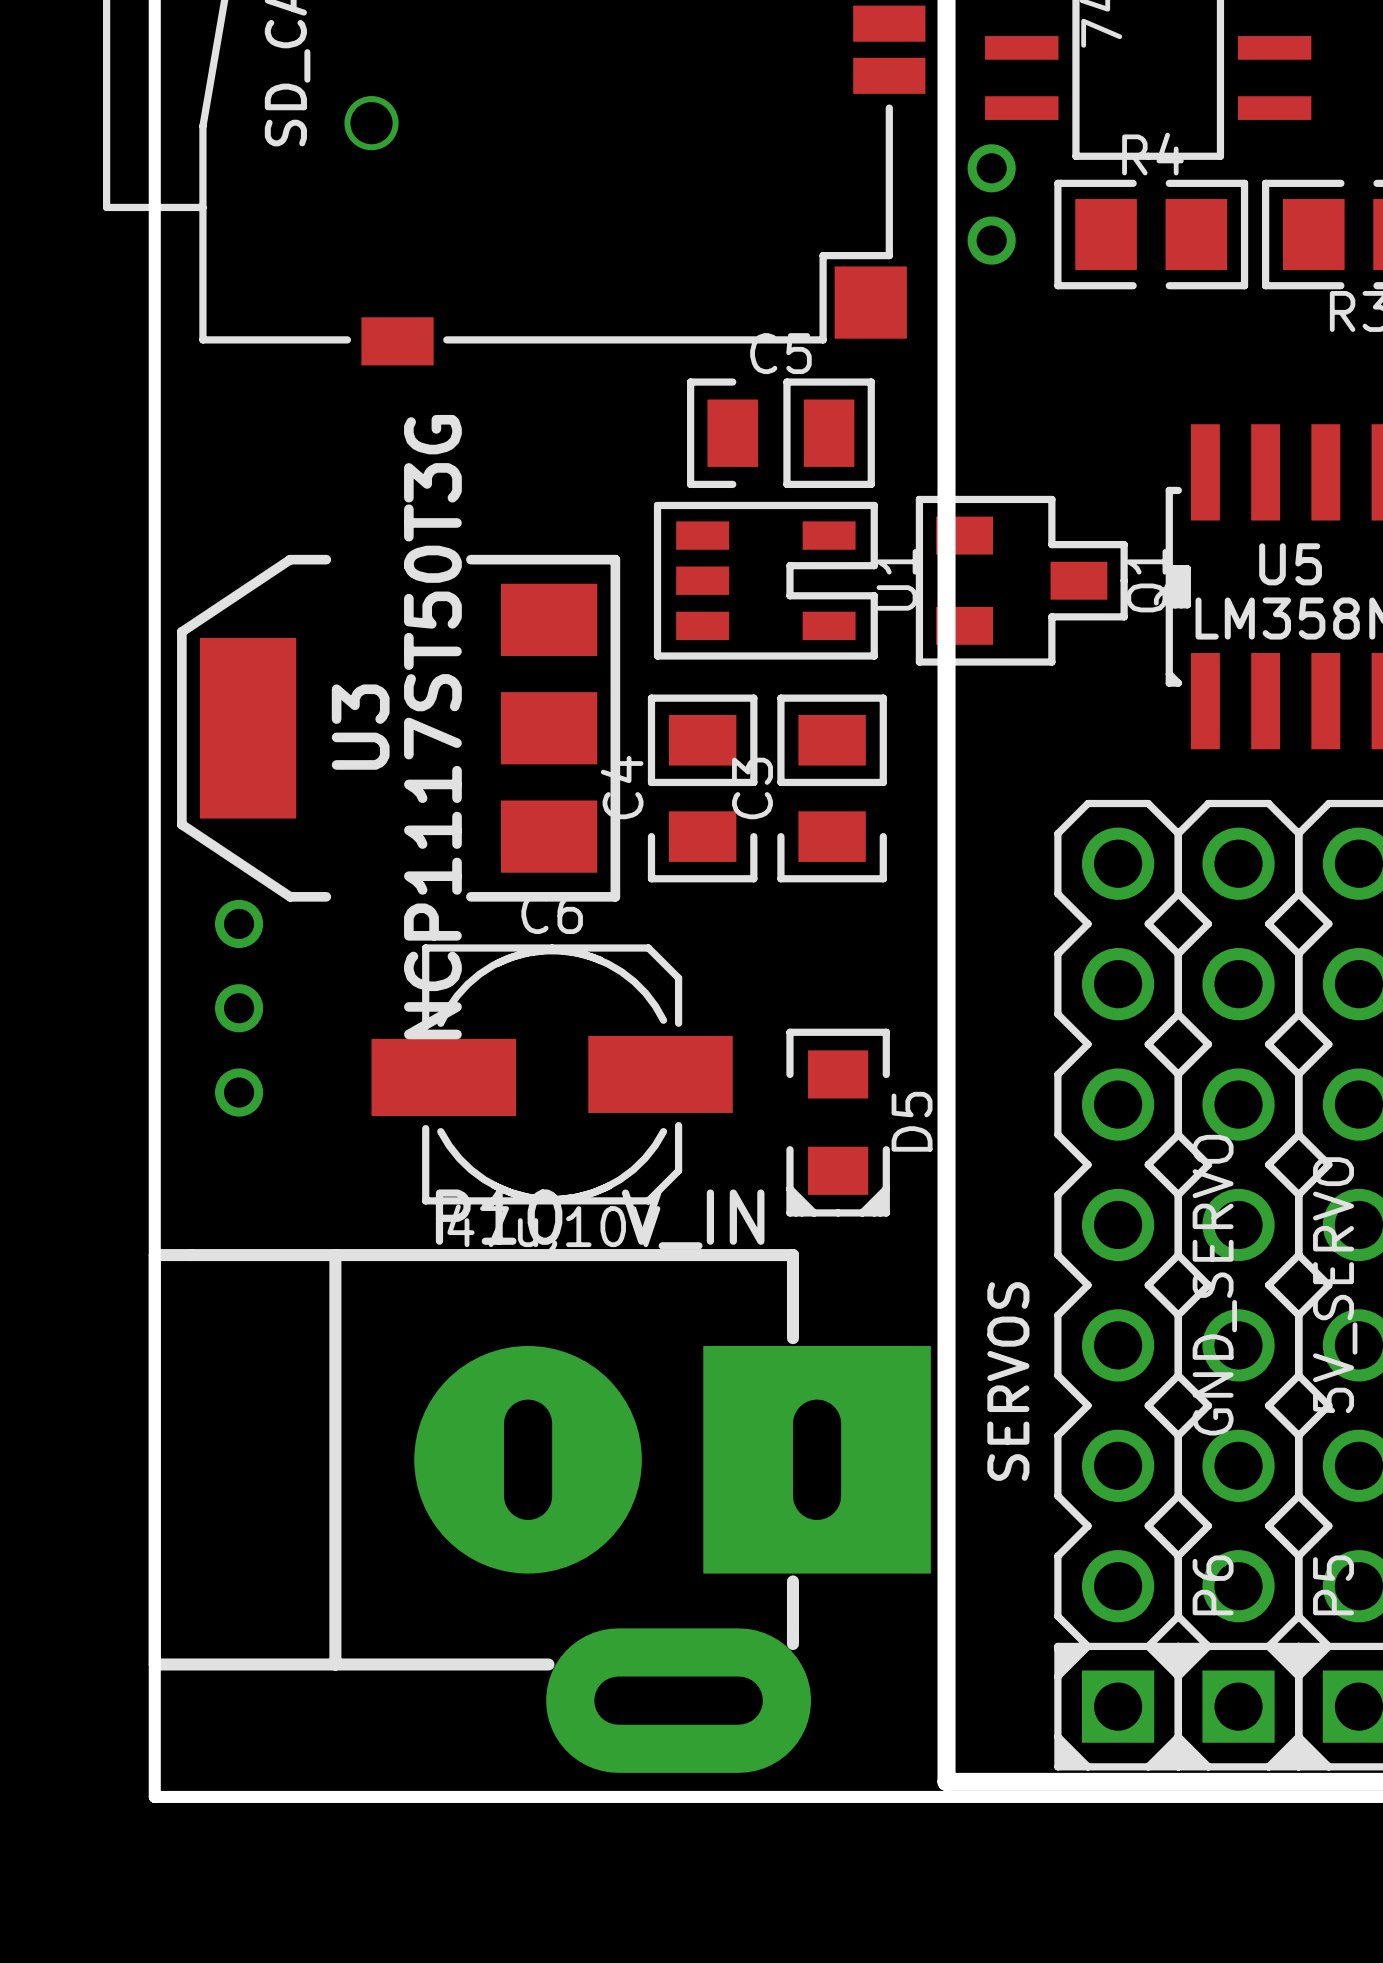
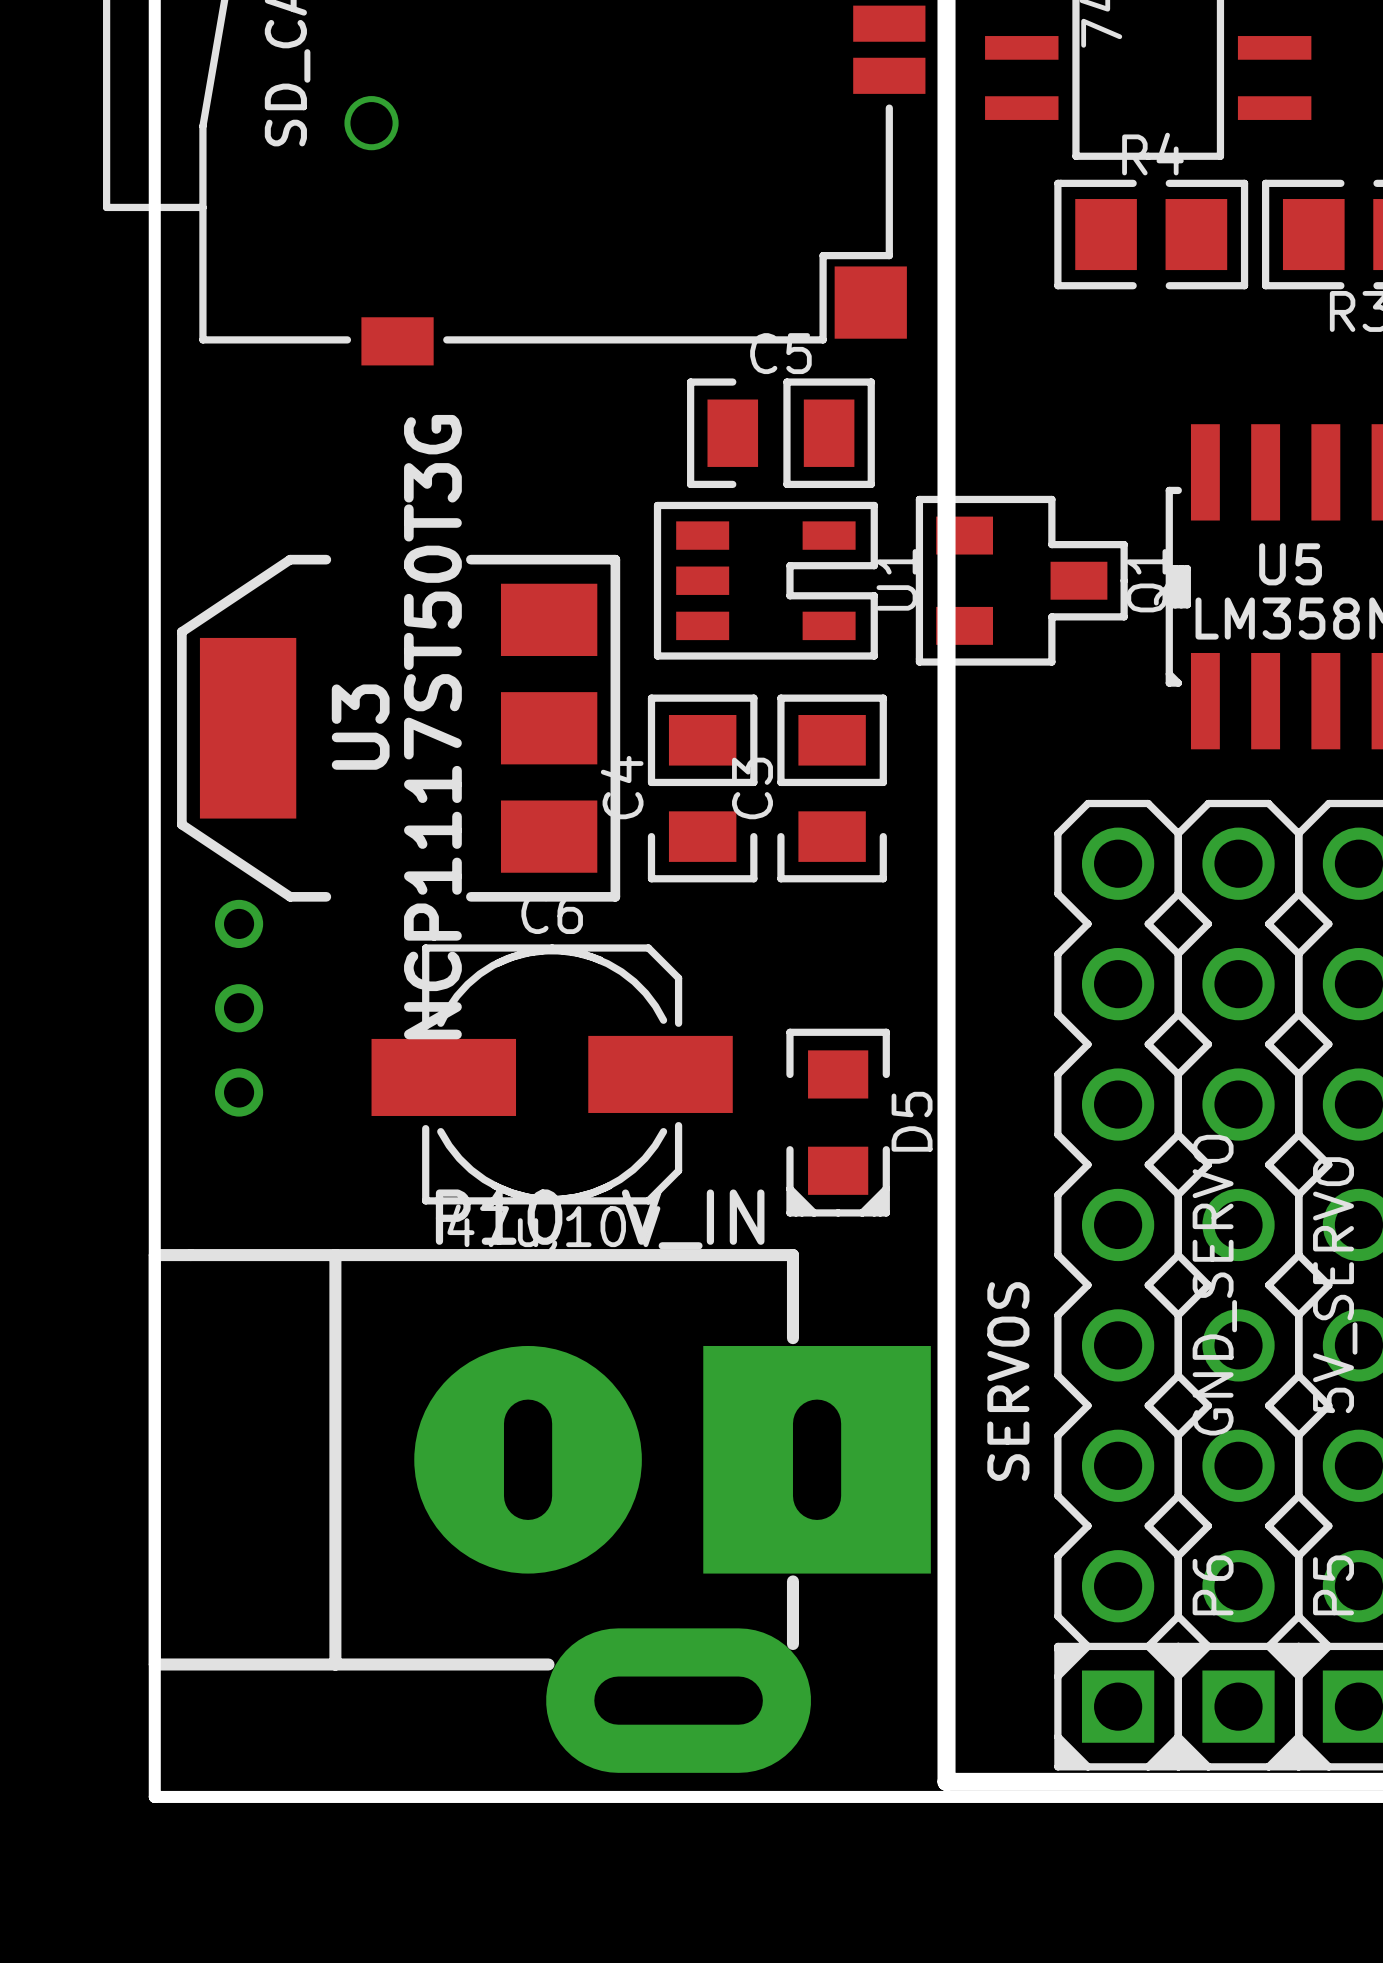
part: (991, 168) -> none
part: (991, 240) -> none

